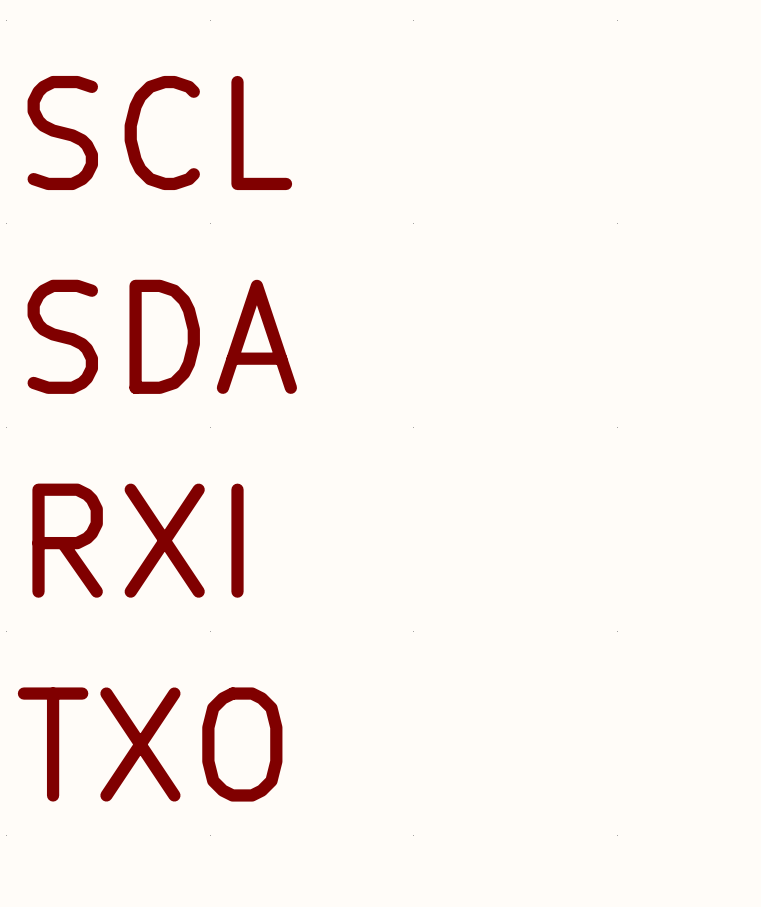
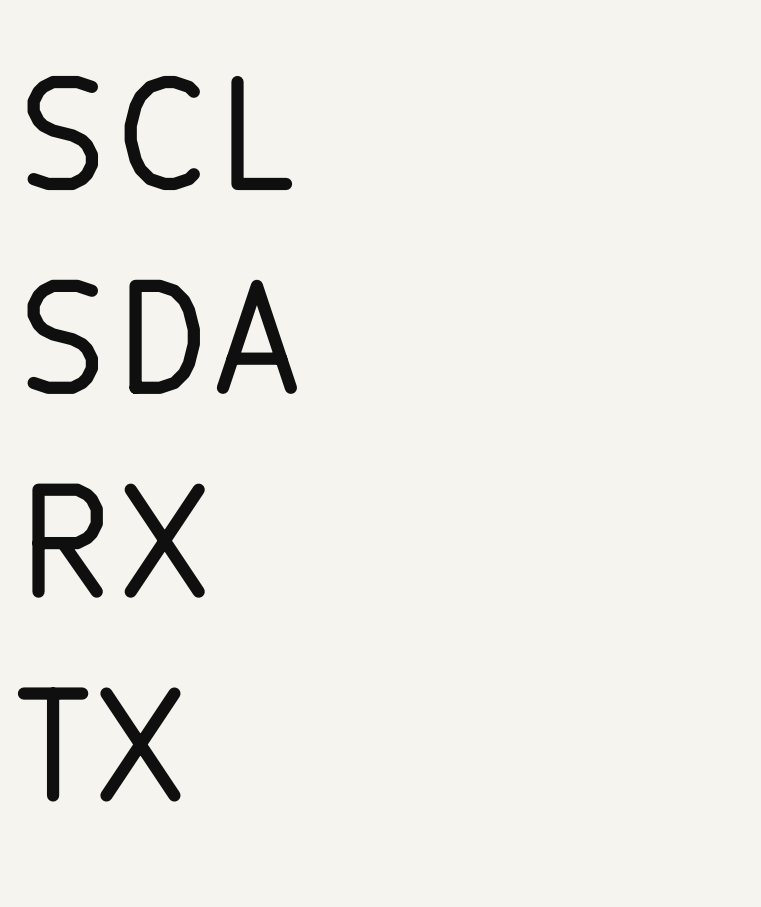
label: RXI (138, 540) -> RX (118, 540)
label: TXO (150, 744) -> TX (99, 744)

